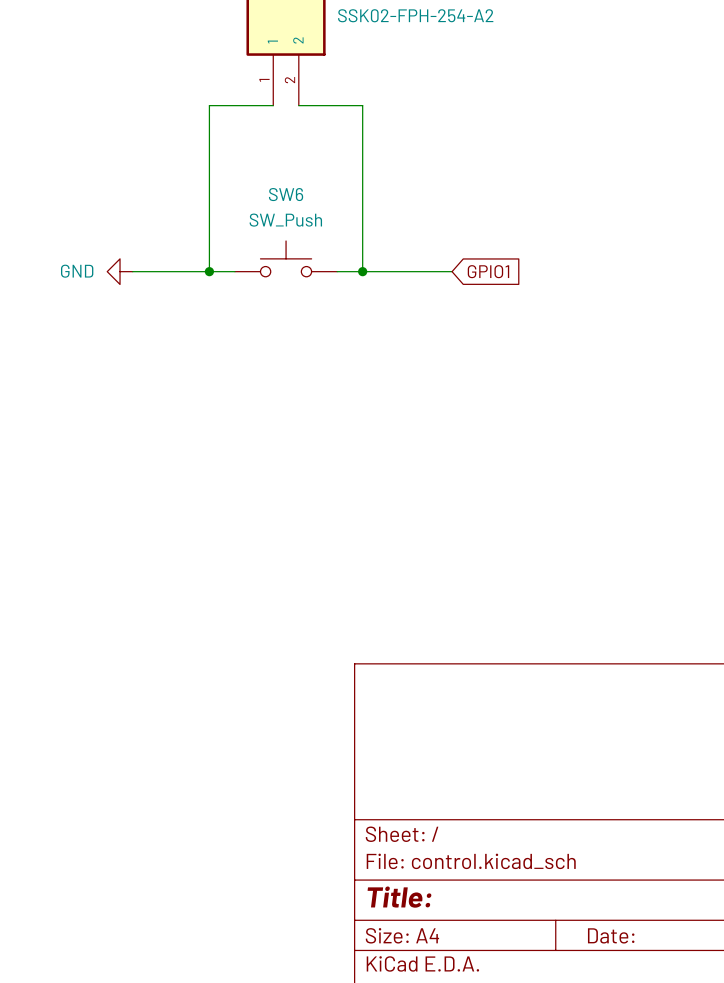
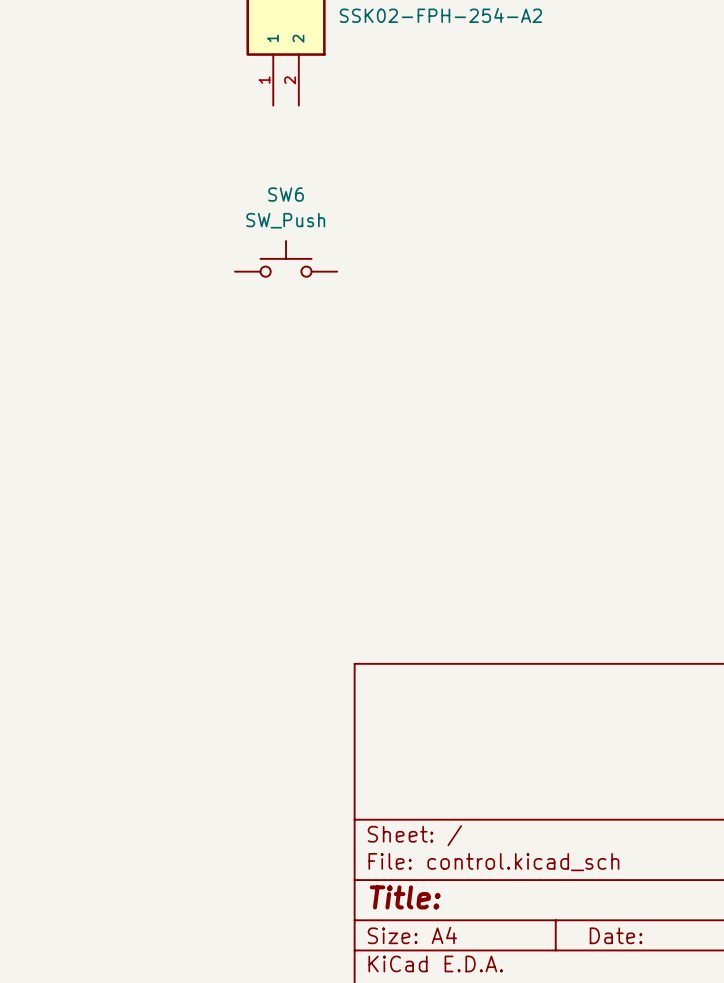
wire: (273, 105) (209, 105) (209, 271) -> none
wire: (298, 105) (362, 105) (362, 271) -> none
power symbol: GND (120, 271) -> none
wire: (132, 271) (234, 271) -> none
junction: (209, 271) -> none
wire: (337, 271) (452, 271) -> none
junction: (362, 271) -> none
global label: GPIO1 (488, 271) -> none

